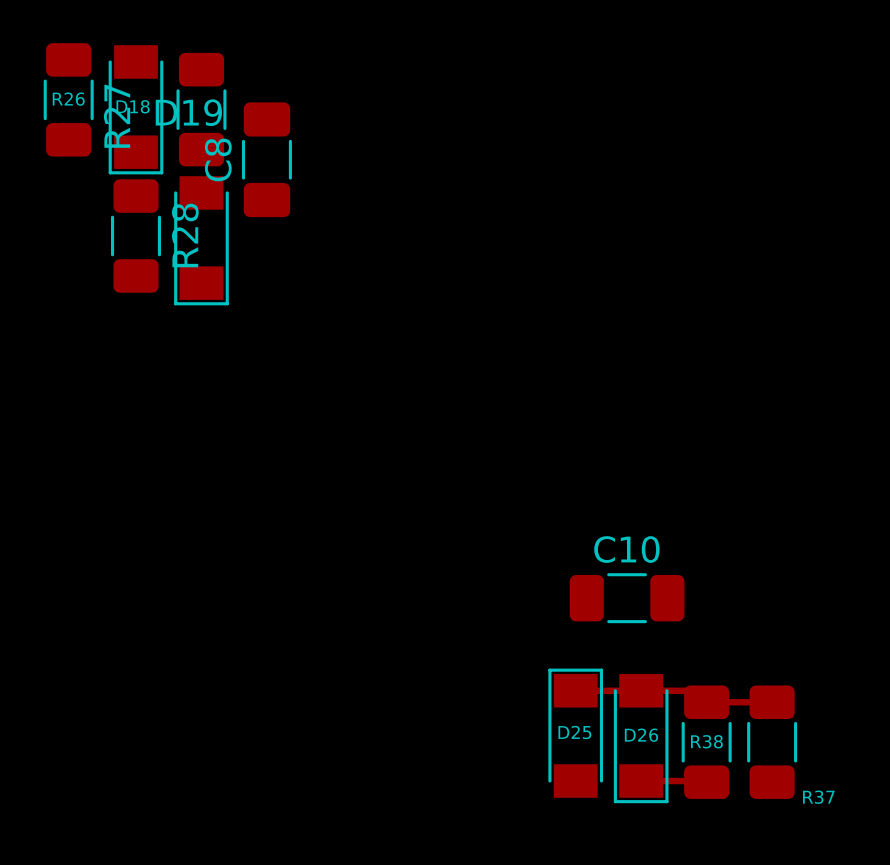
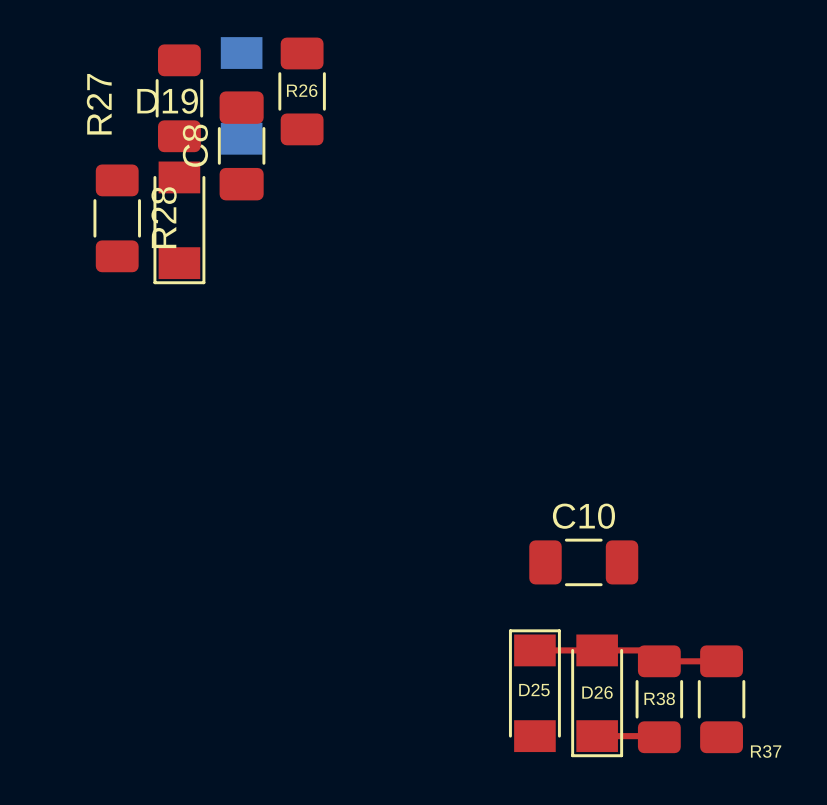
R26 position: (68, 99) -> (302, 91)
D18 side: top (135, 109) -> bottom (241, 95)

